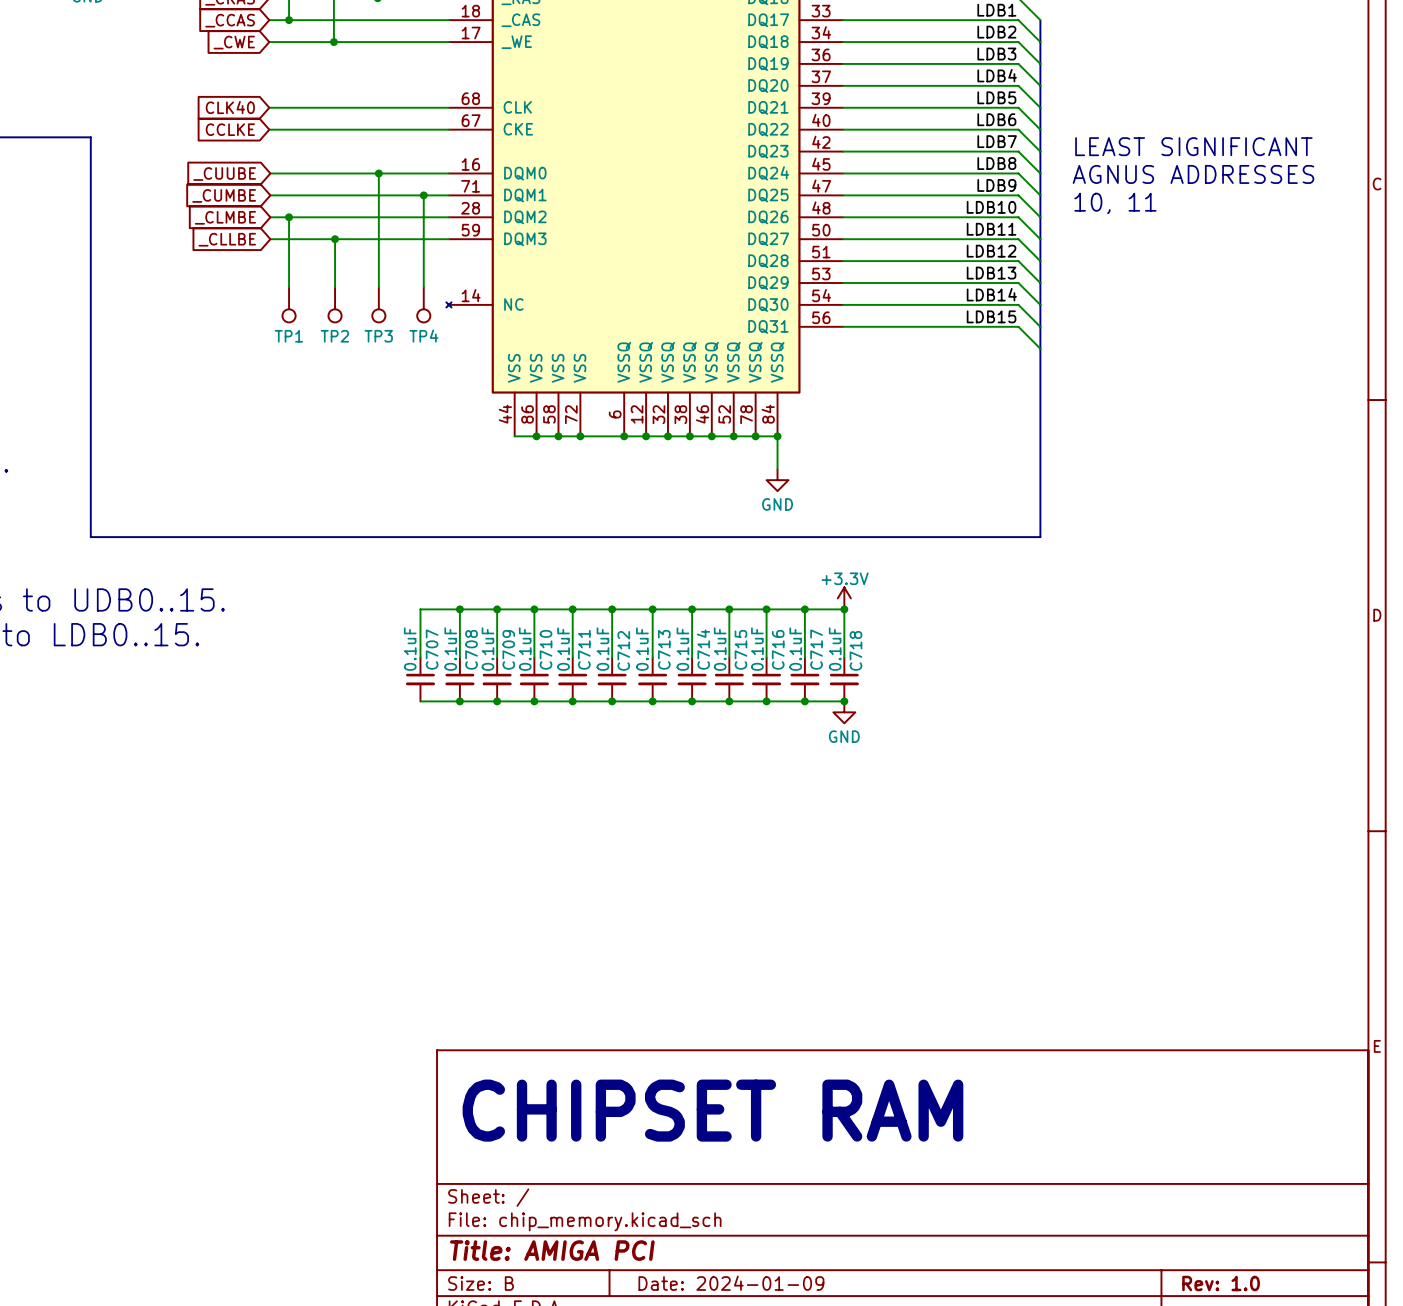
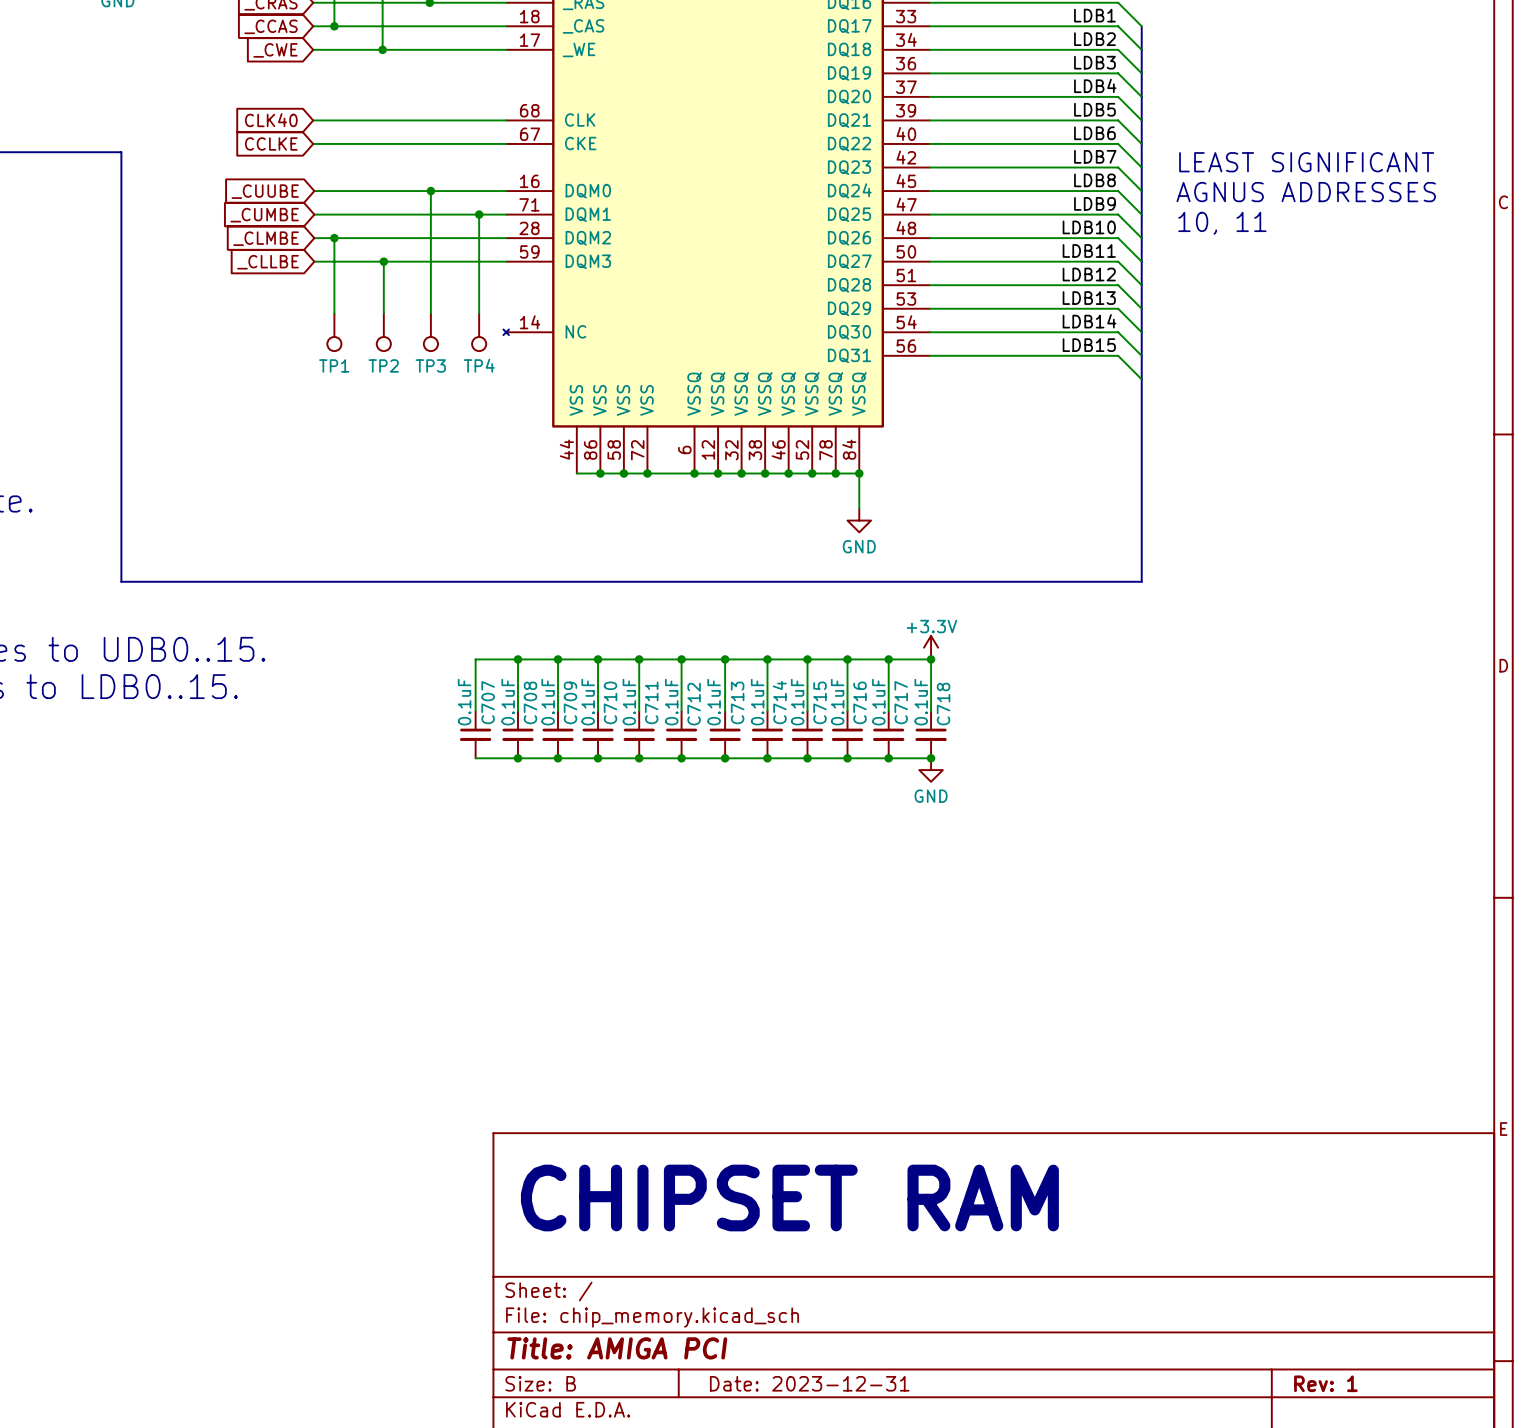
title block: Date: 2024-01-09 (731, 1283) -> Date: 2023-12-31 (809, 1383)
title block: Rev: 1.0 (1221, 1283) -> Rev: 1 (1325, 1383)

